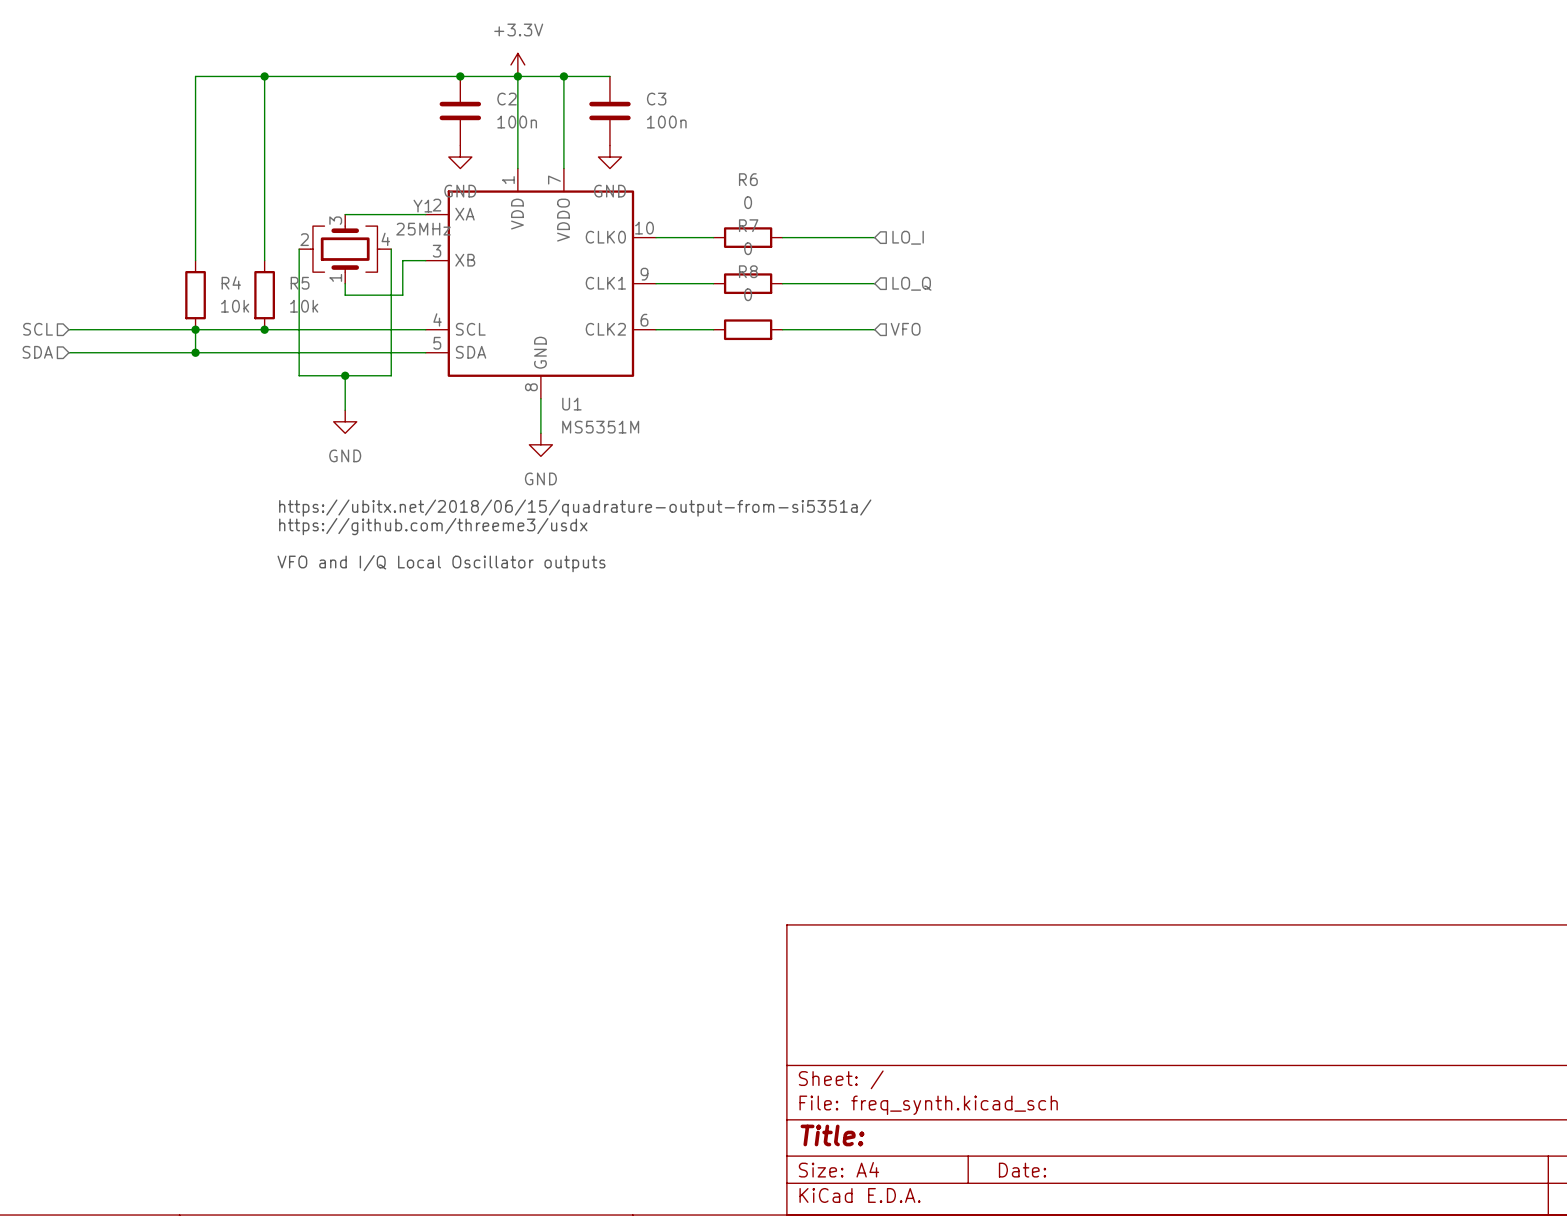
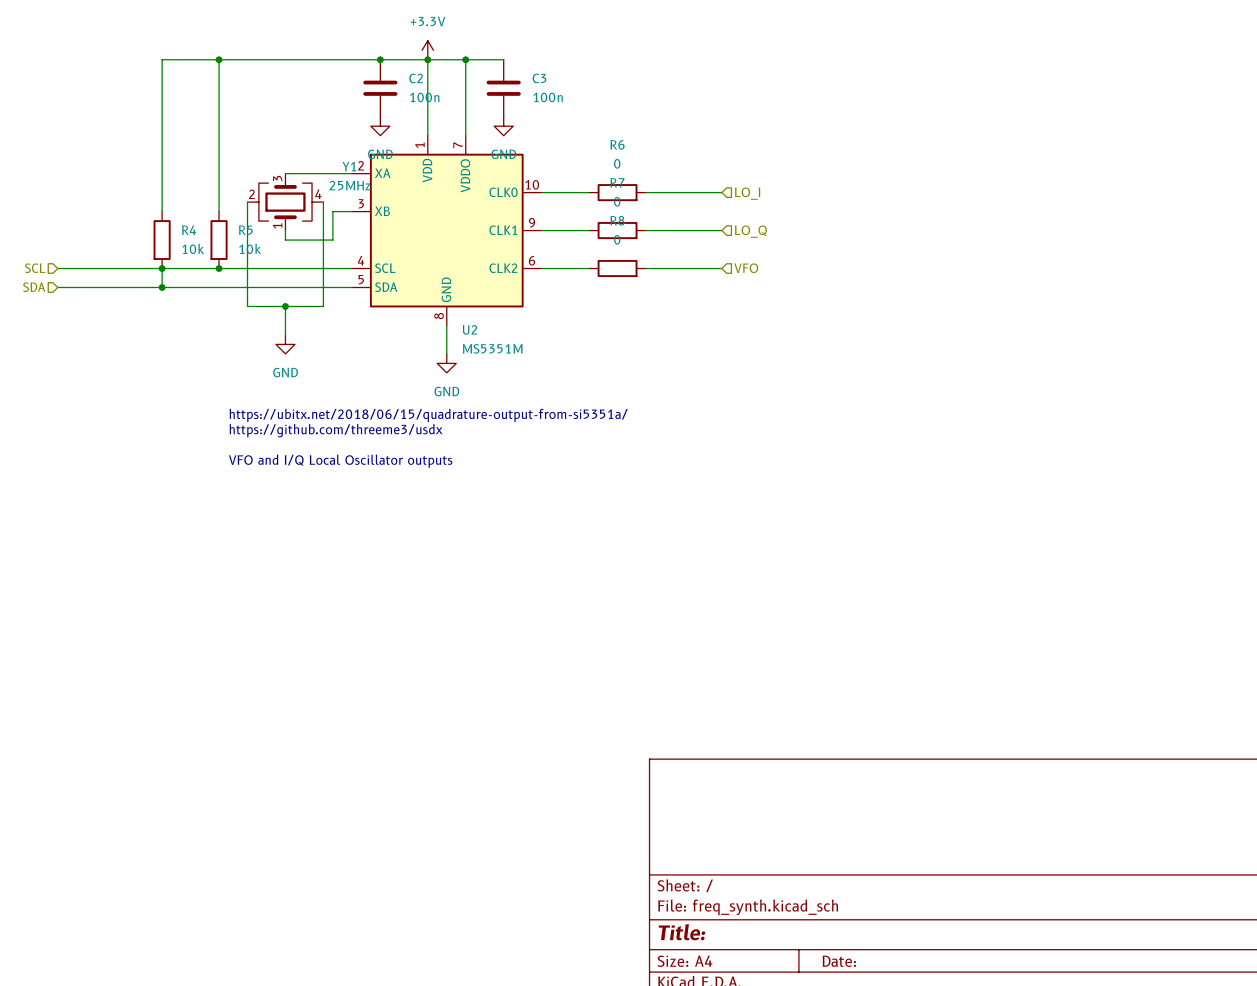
U1 name: U1 (571, 404) -> U2 (469, 329)

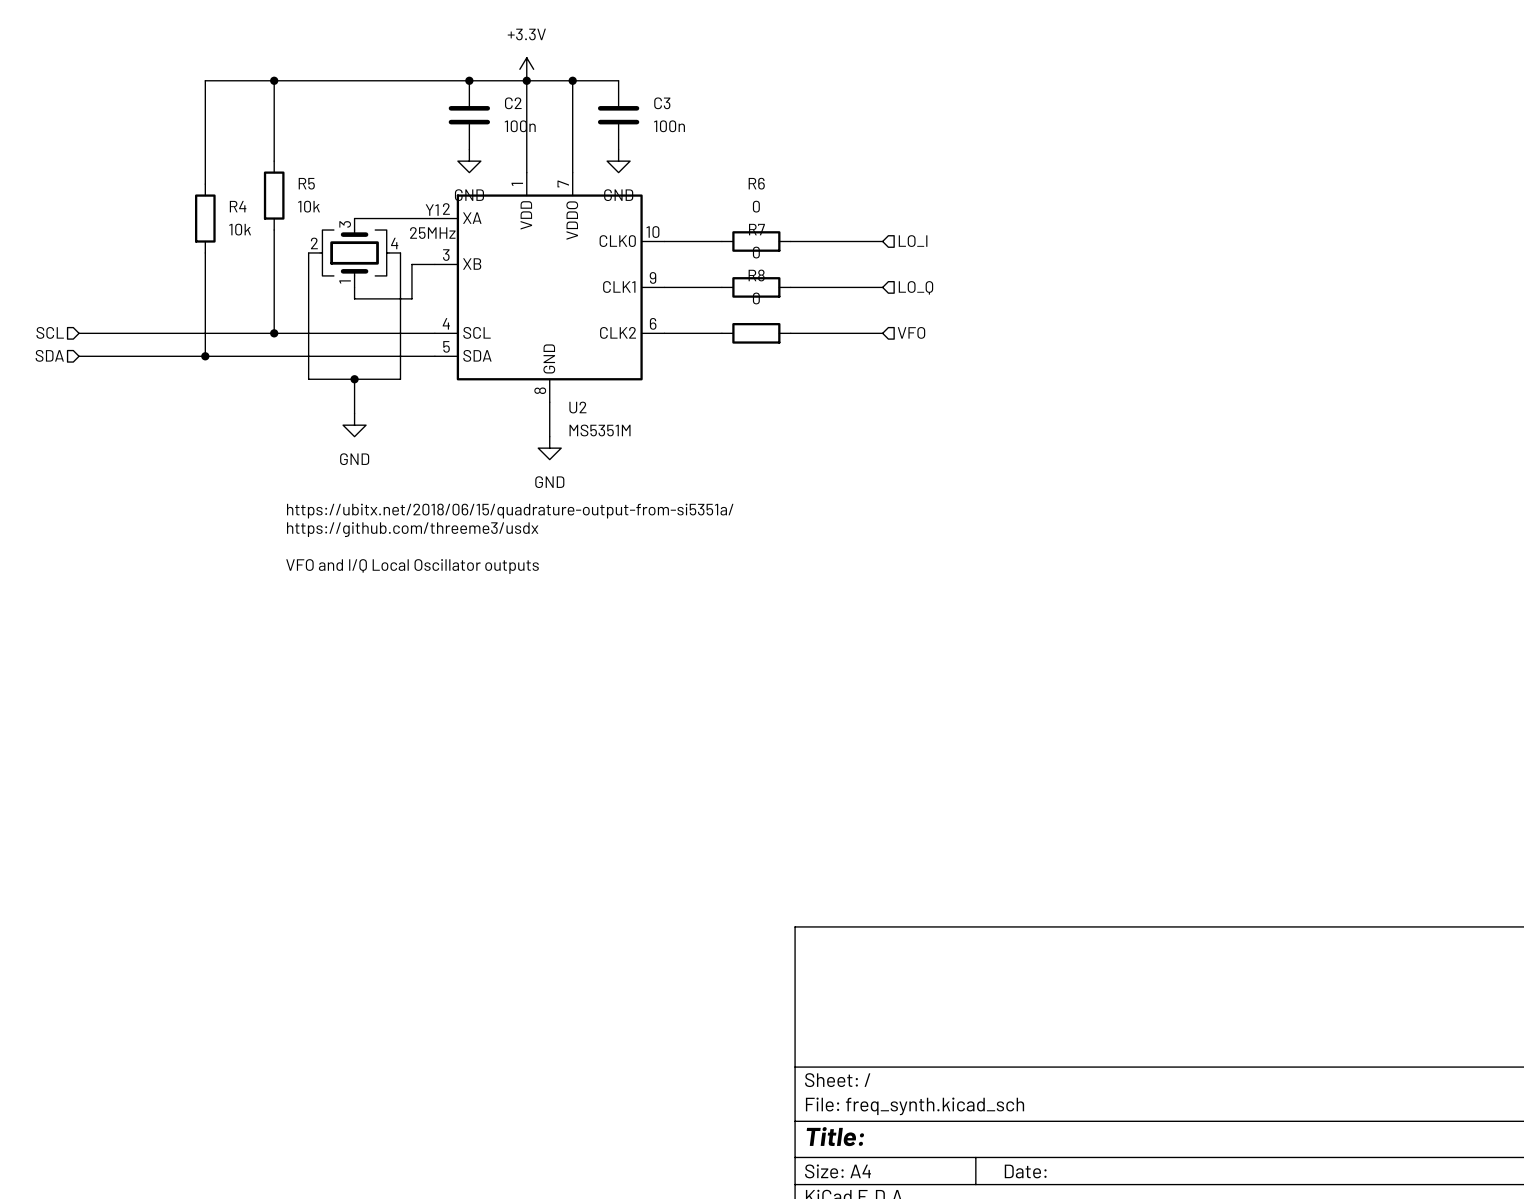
wire: (219, 126) (219, 183) -> (274, 264) (274, 333)
wire: (162, 145) (162, 202) -> (205, 264) (205, 333)
R4 position: (162, 240) -> (205, 218)
R5 position: (219, 240) -> (274, 195)
junction: (162, 268) -> none

